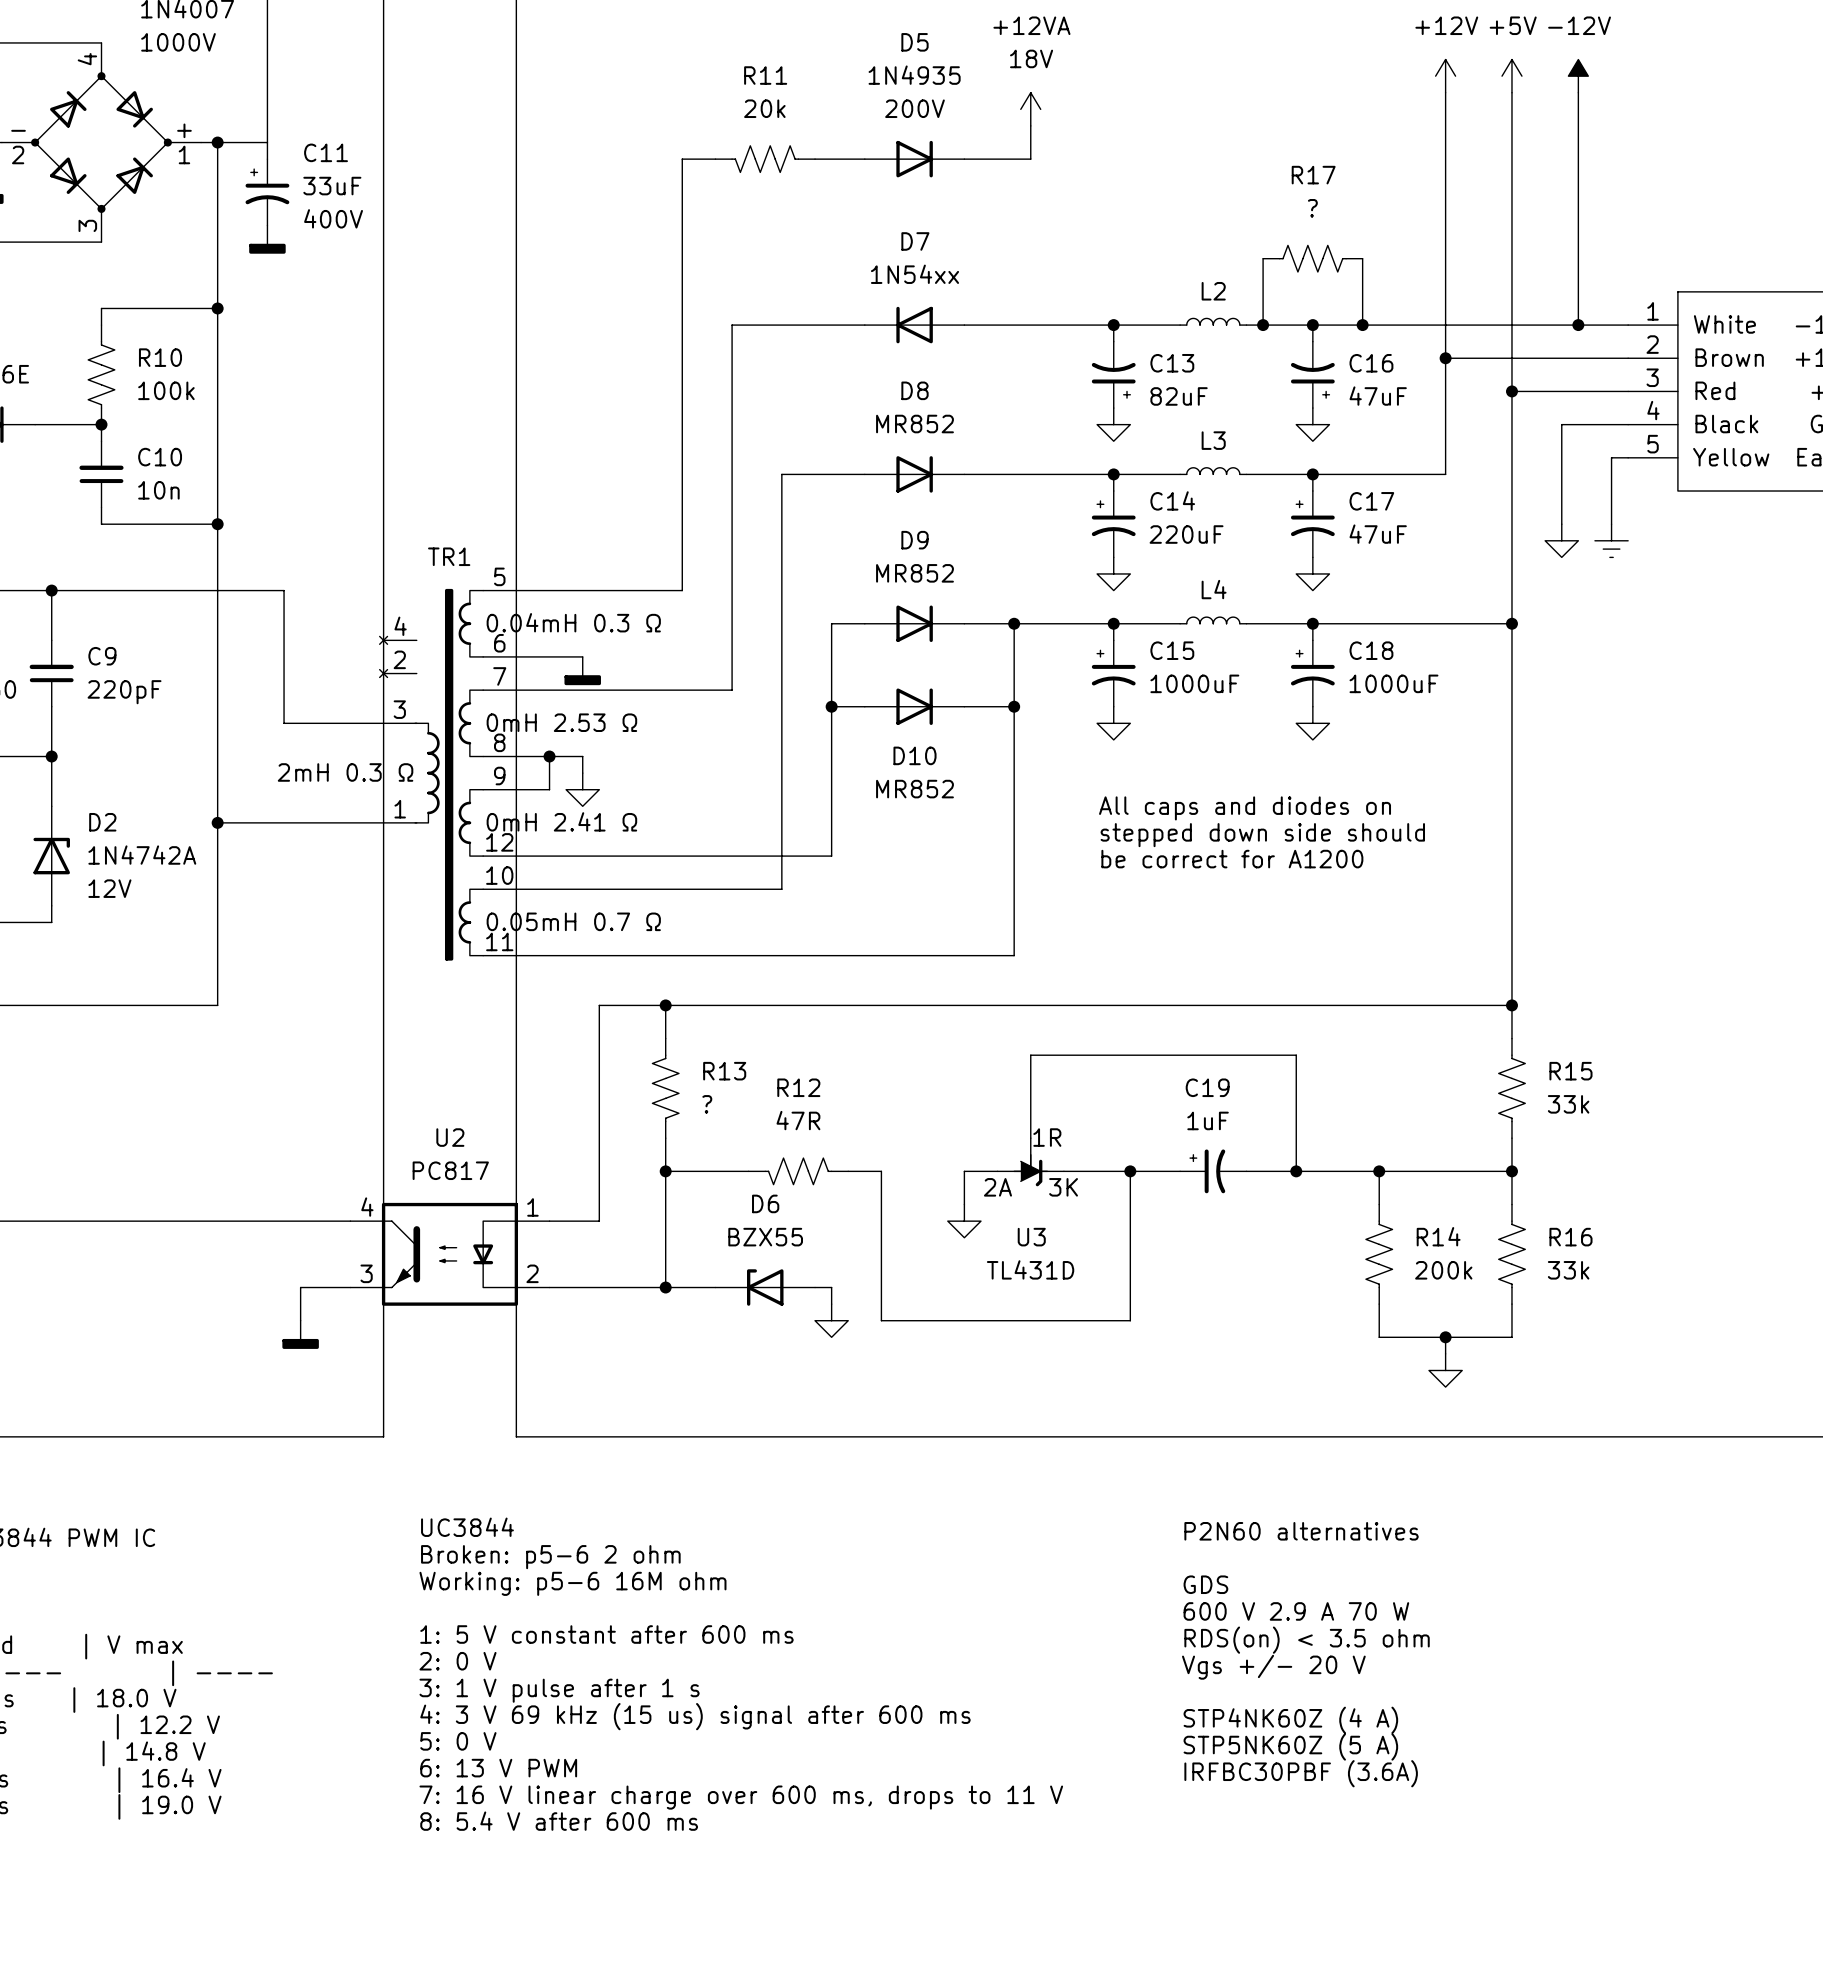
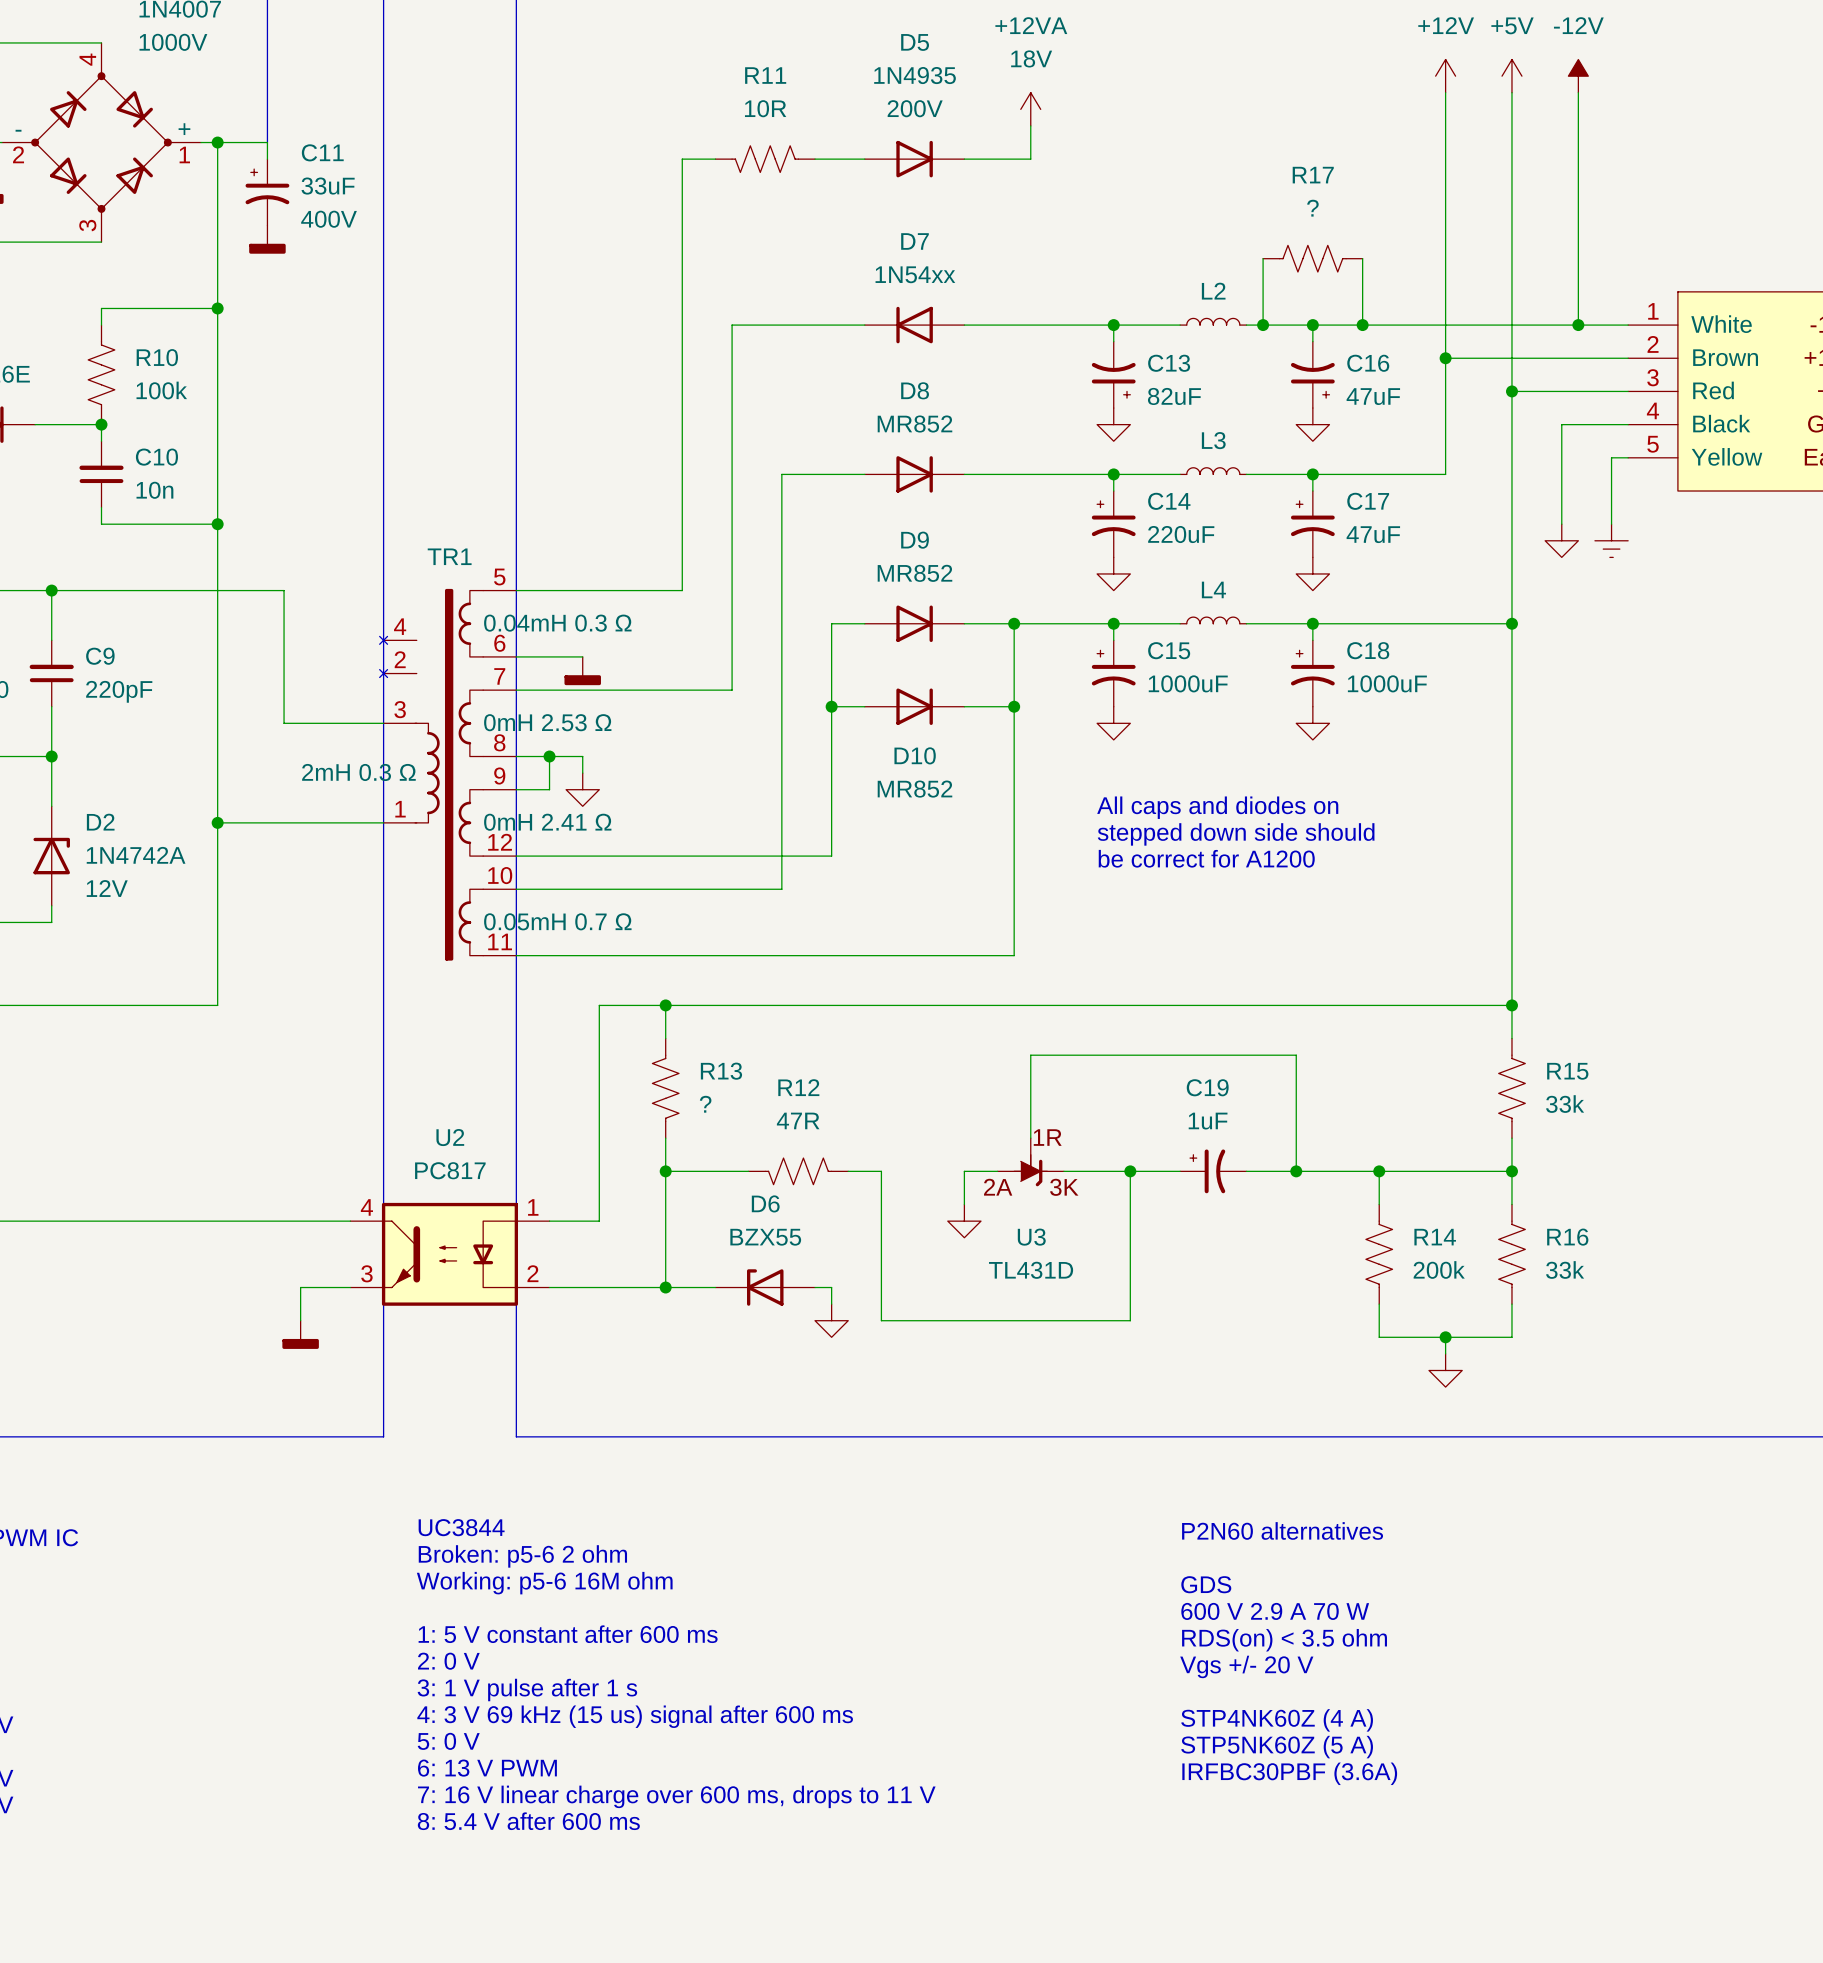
R11 value: 20k (764, 108) -> 10R (765, 108)

